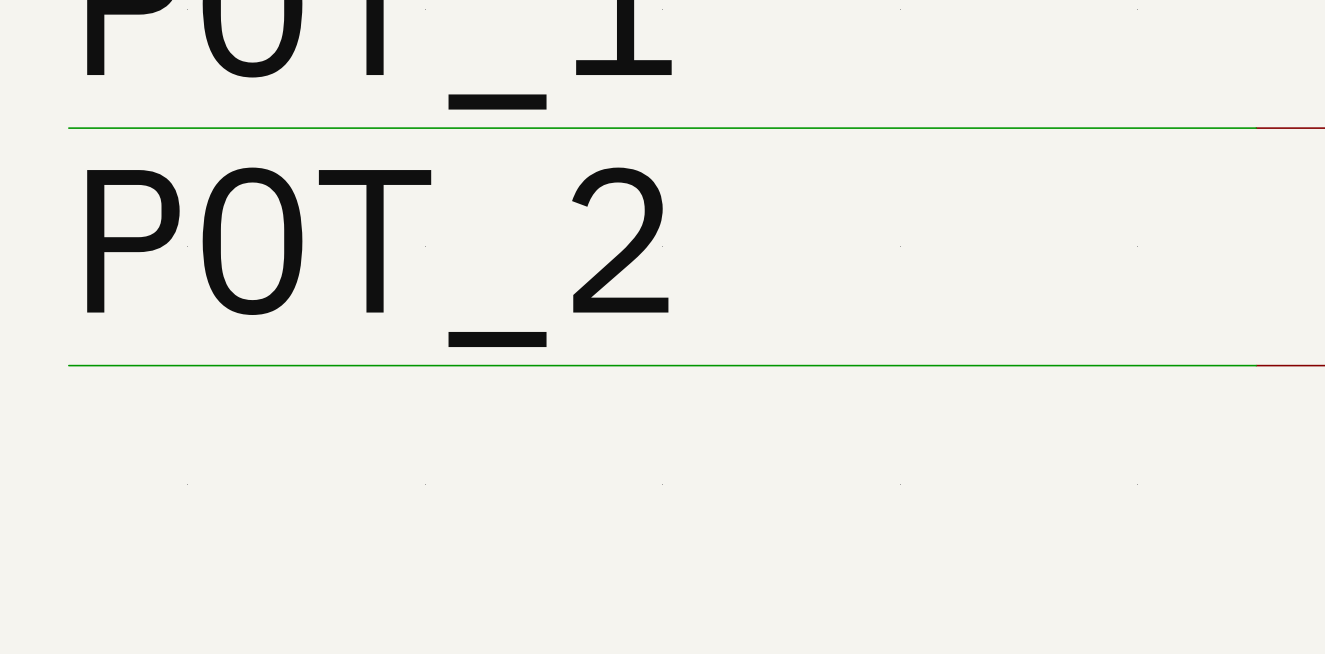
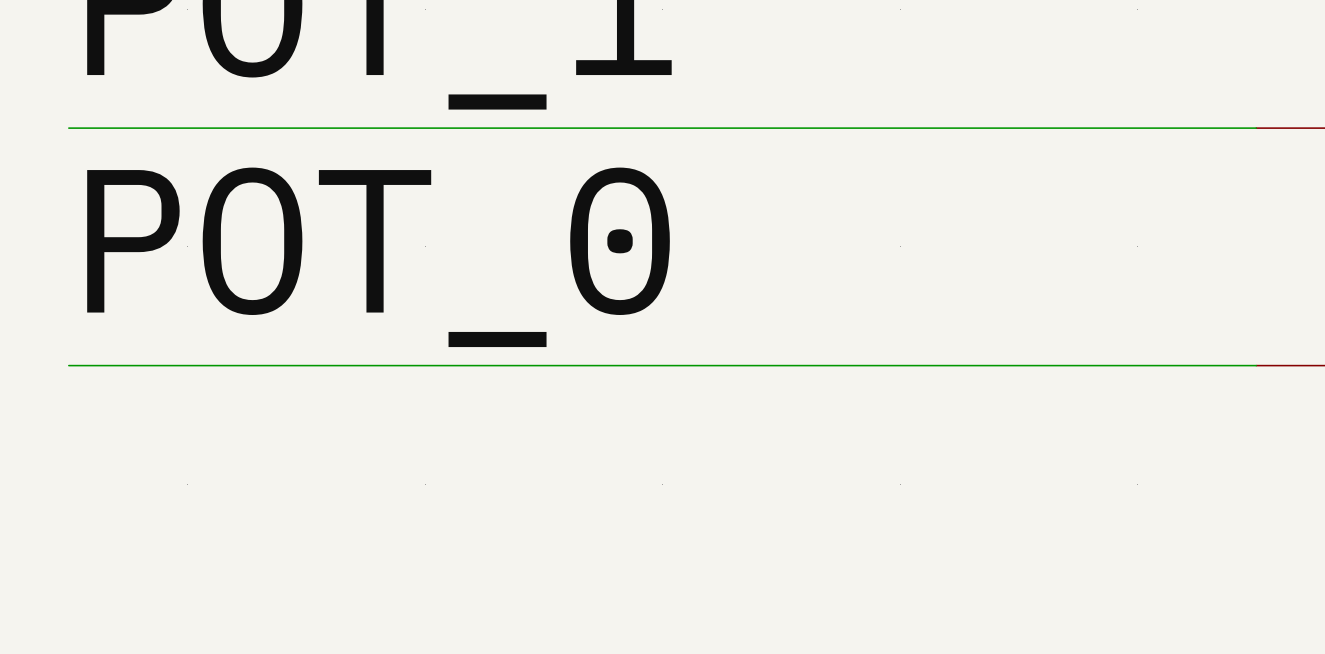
label: POT_2 (377, 257) -> POT_0 (378, 257)

